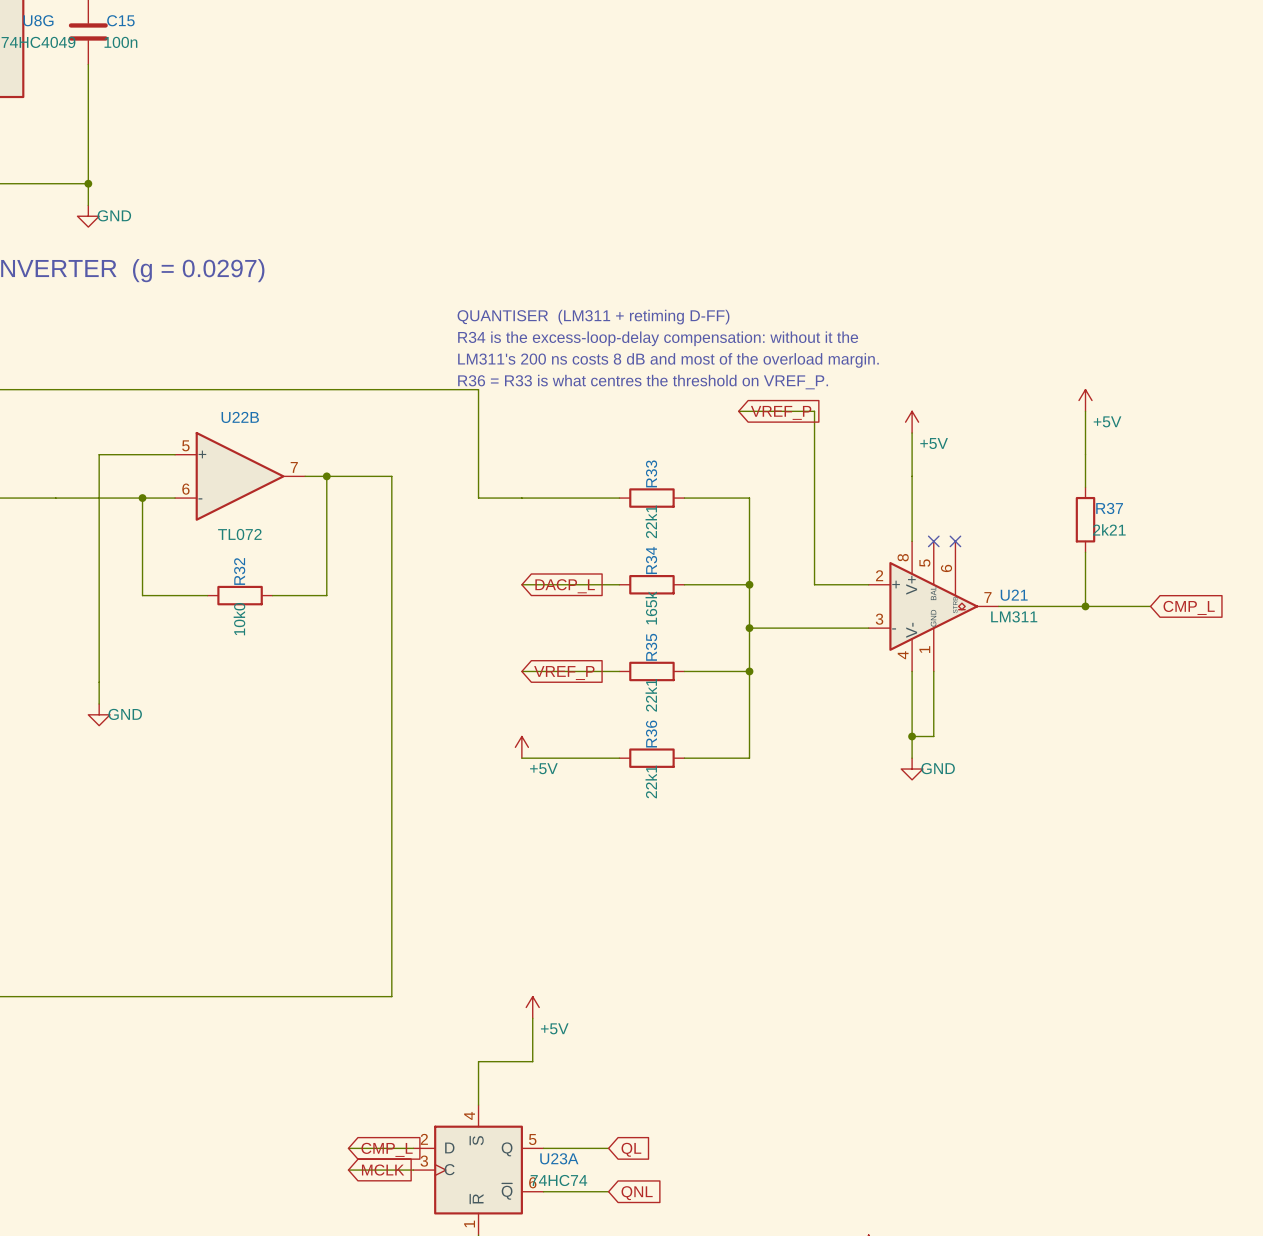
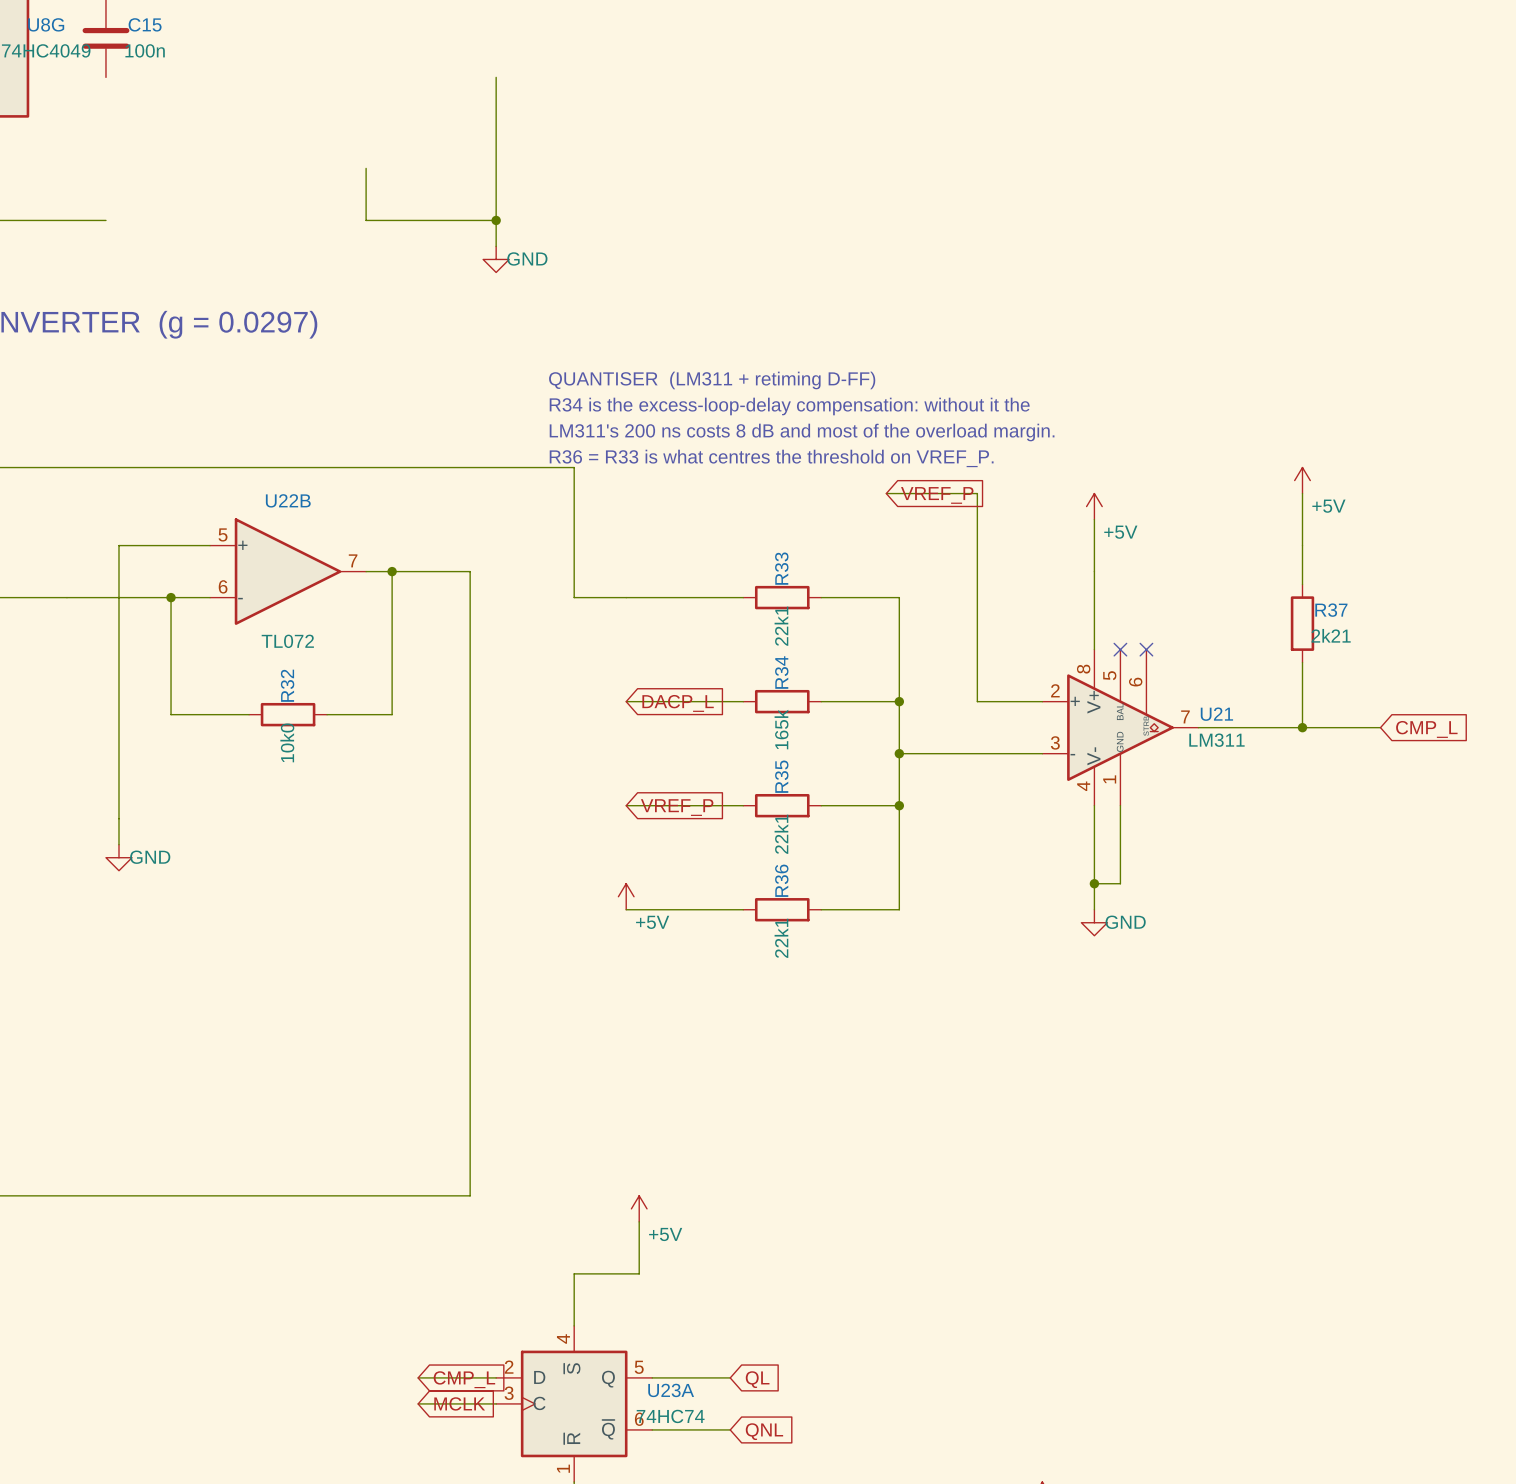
wire: (88, 64) (88, 205) -> none
wire: none -> (496, 77) (496, 246)
wire: none -> (366, 168) (366, 220) (496, 220)
junction: (88, 183) -> none
junction: none -> (496, 220)
power symbol: GND (88, 216) -> none
power symbol: none -> GND (496, 259)

